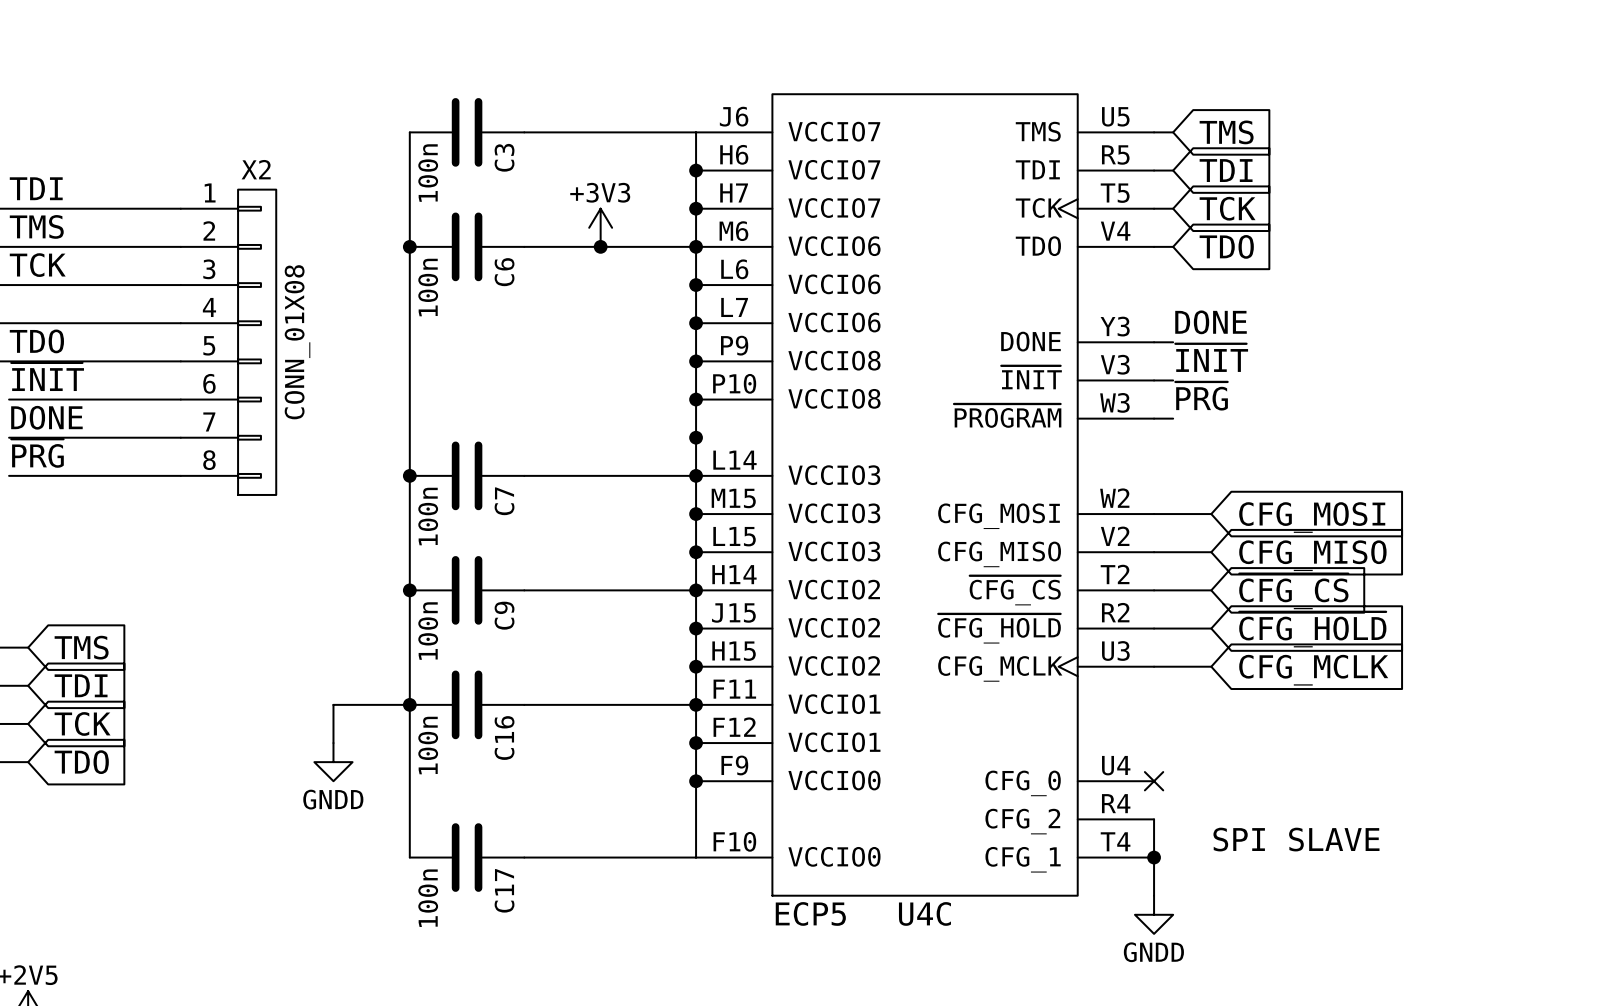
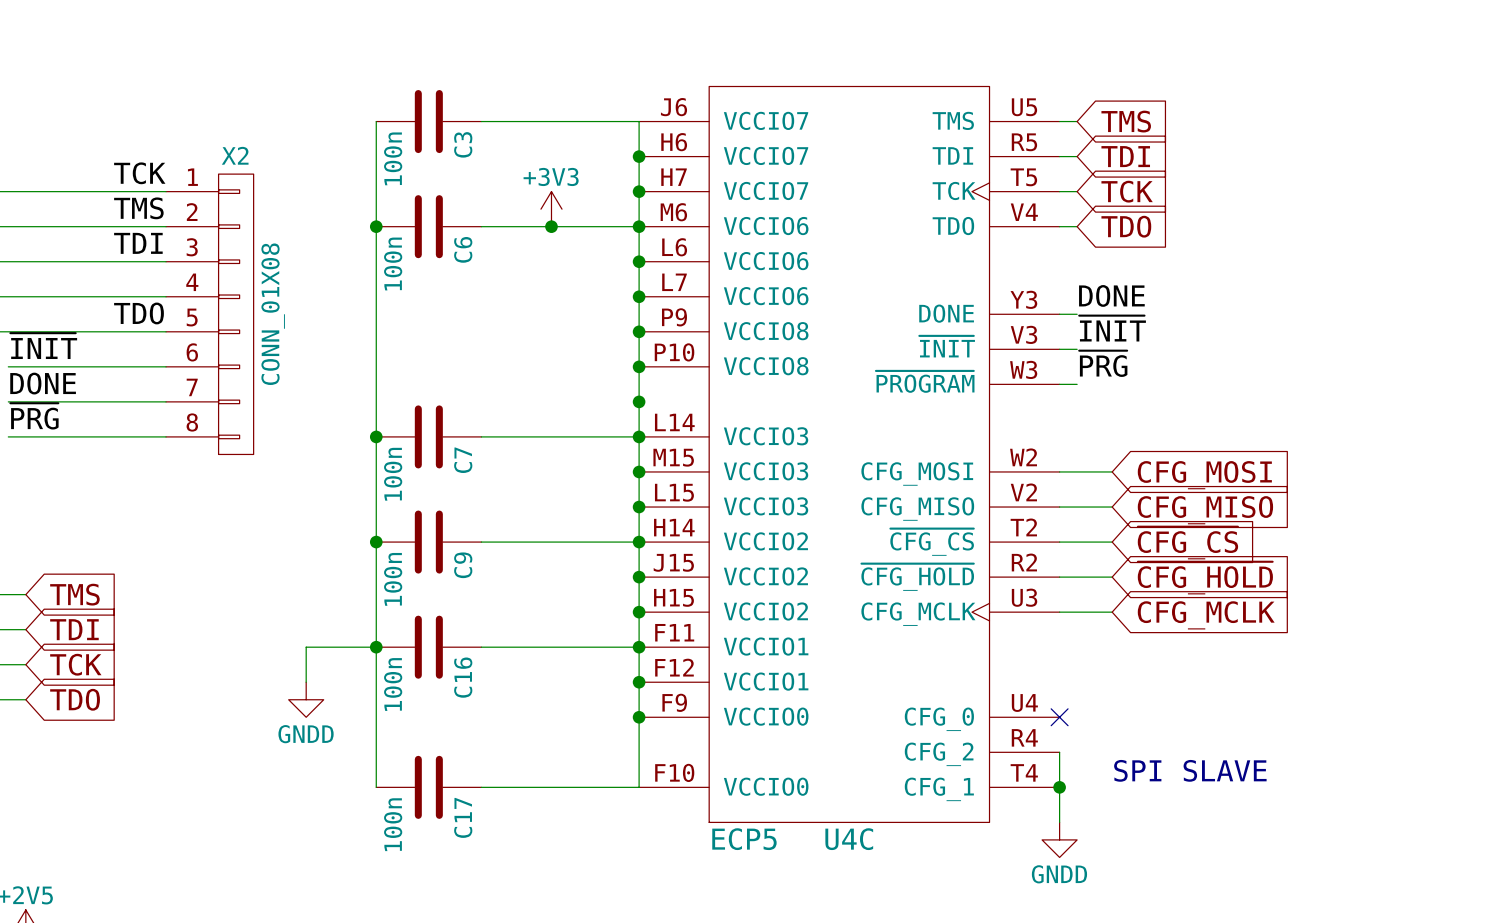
label position: TDI (36, 188) -> TDI (138, 243)
label position: TMS (36, 226) -> TMS (138, 208)
label position: TCK (37, 265) -> TCK (139, 173)
label position: TDO (36, 341) -> TDO (139, 313)

